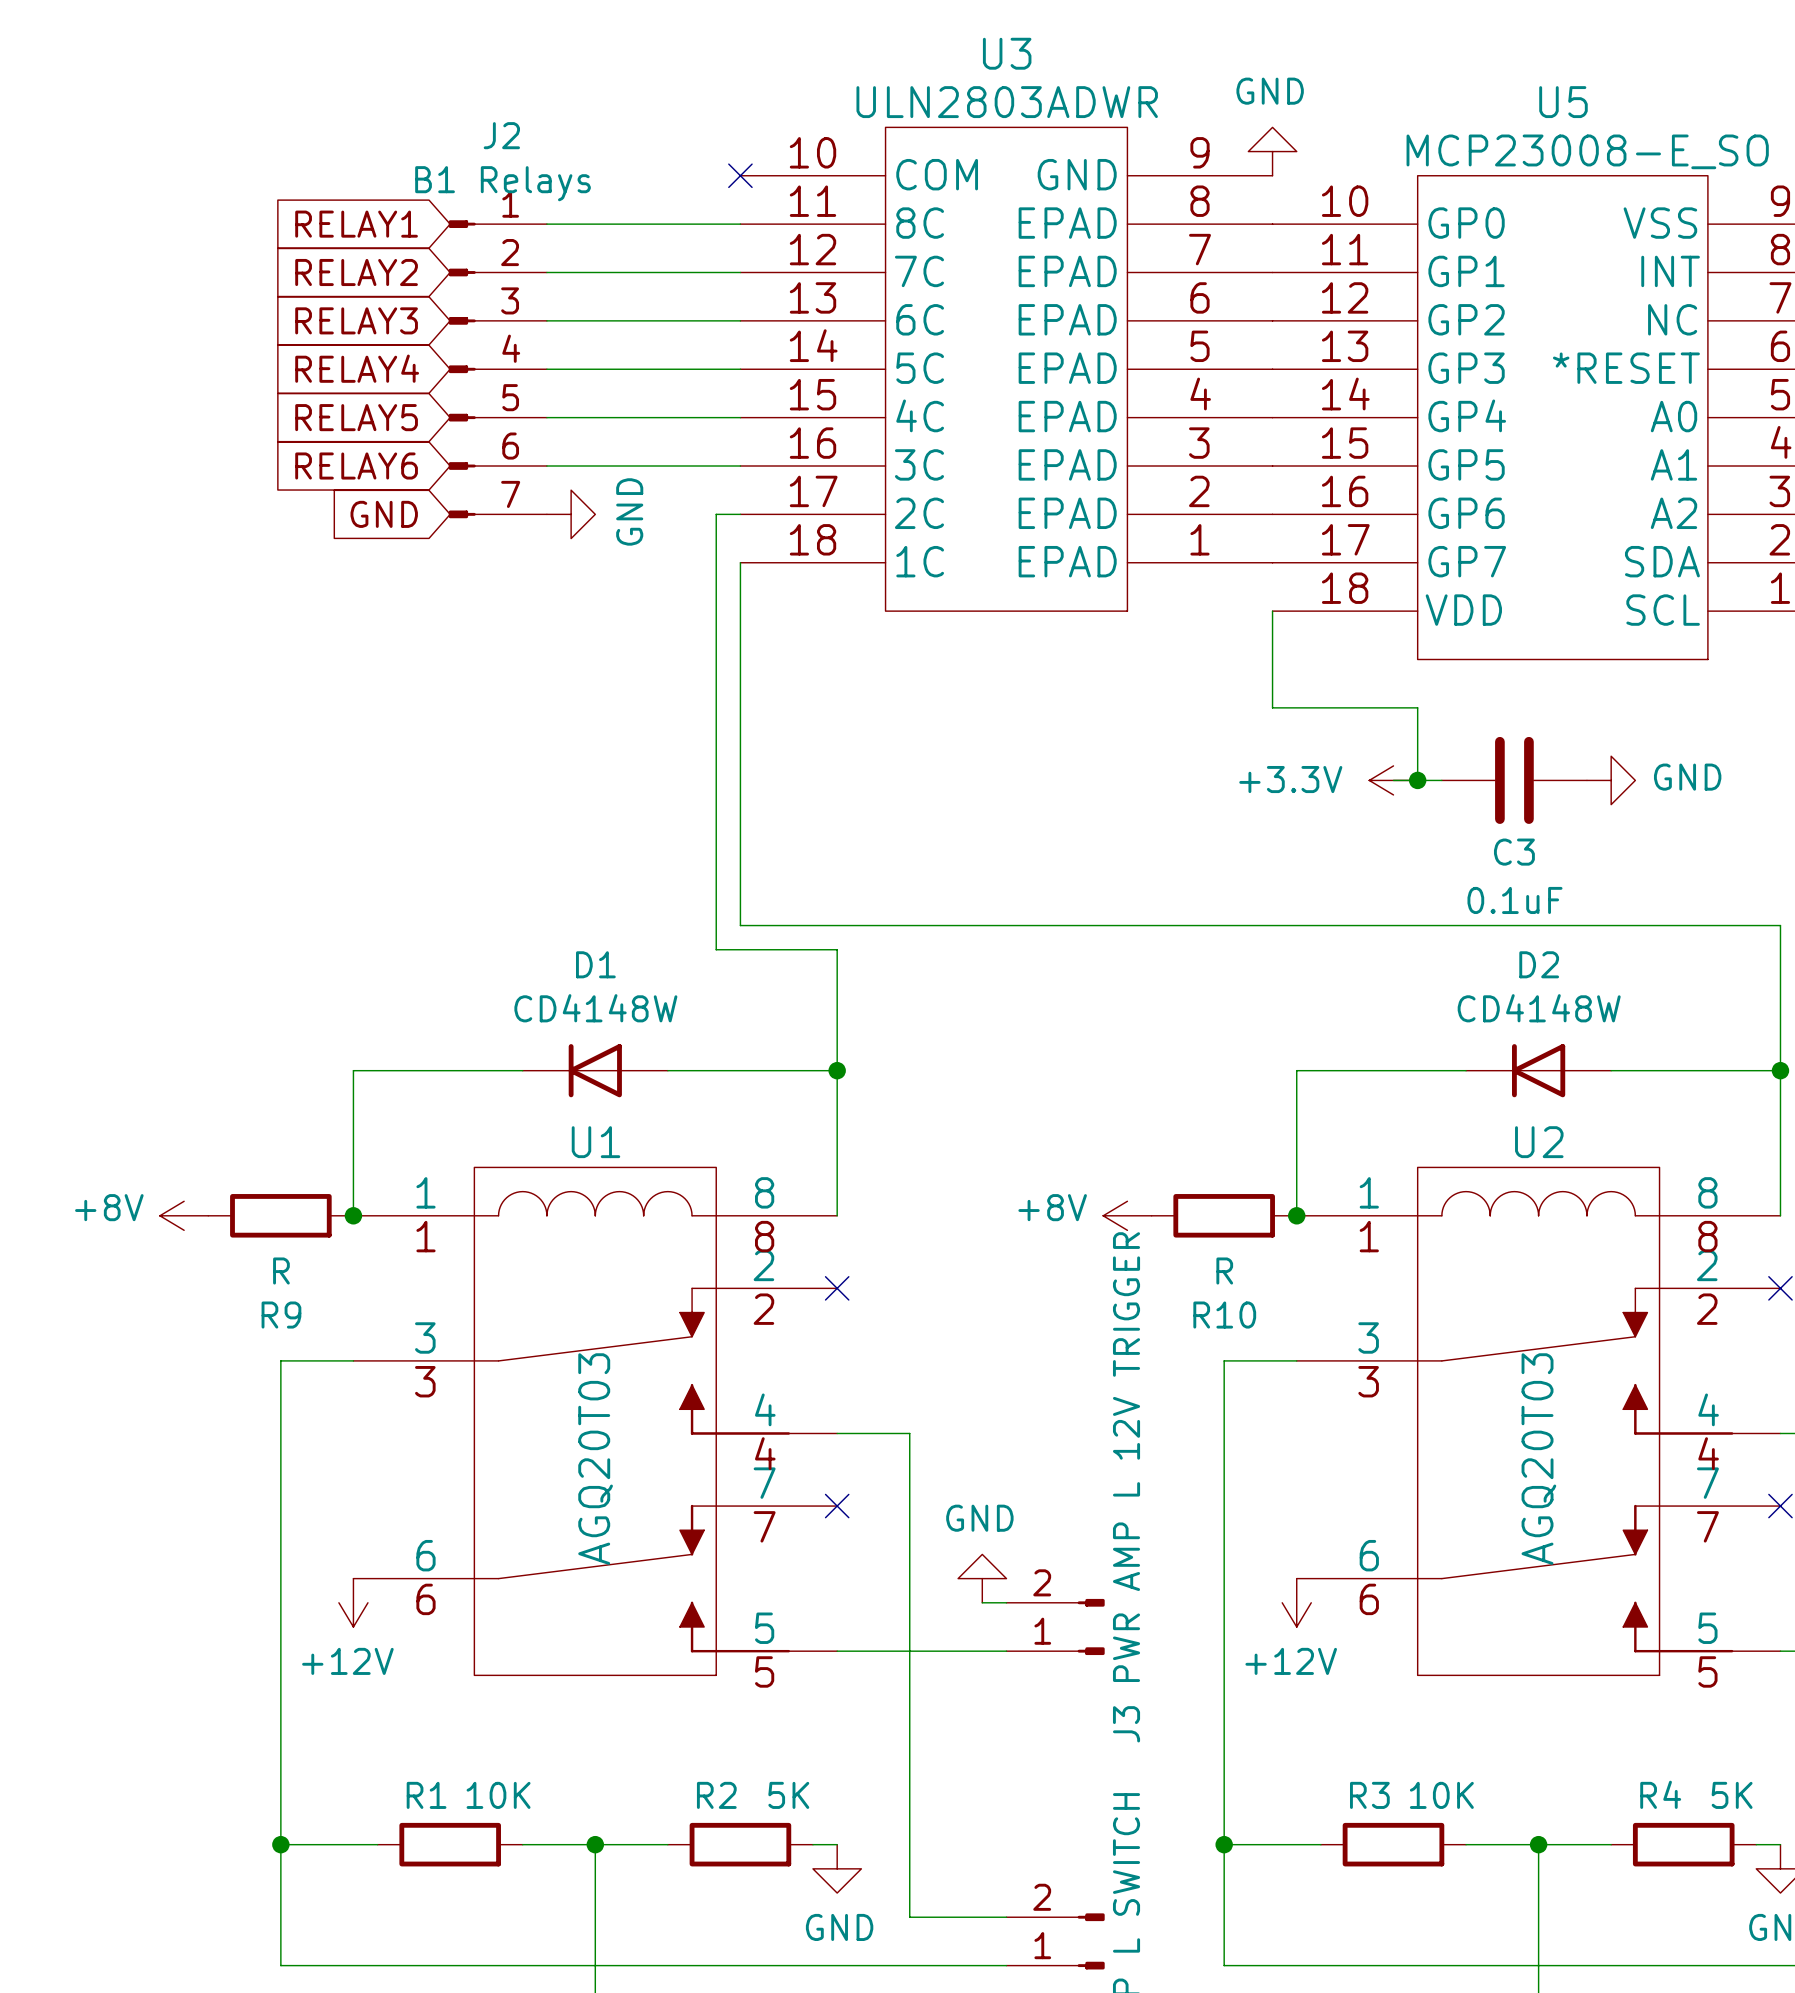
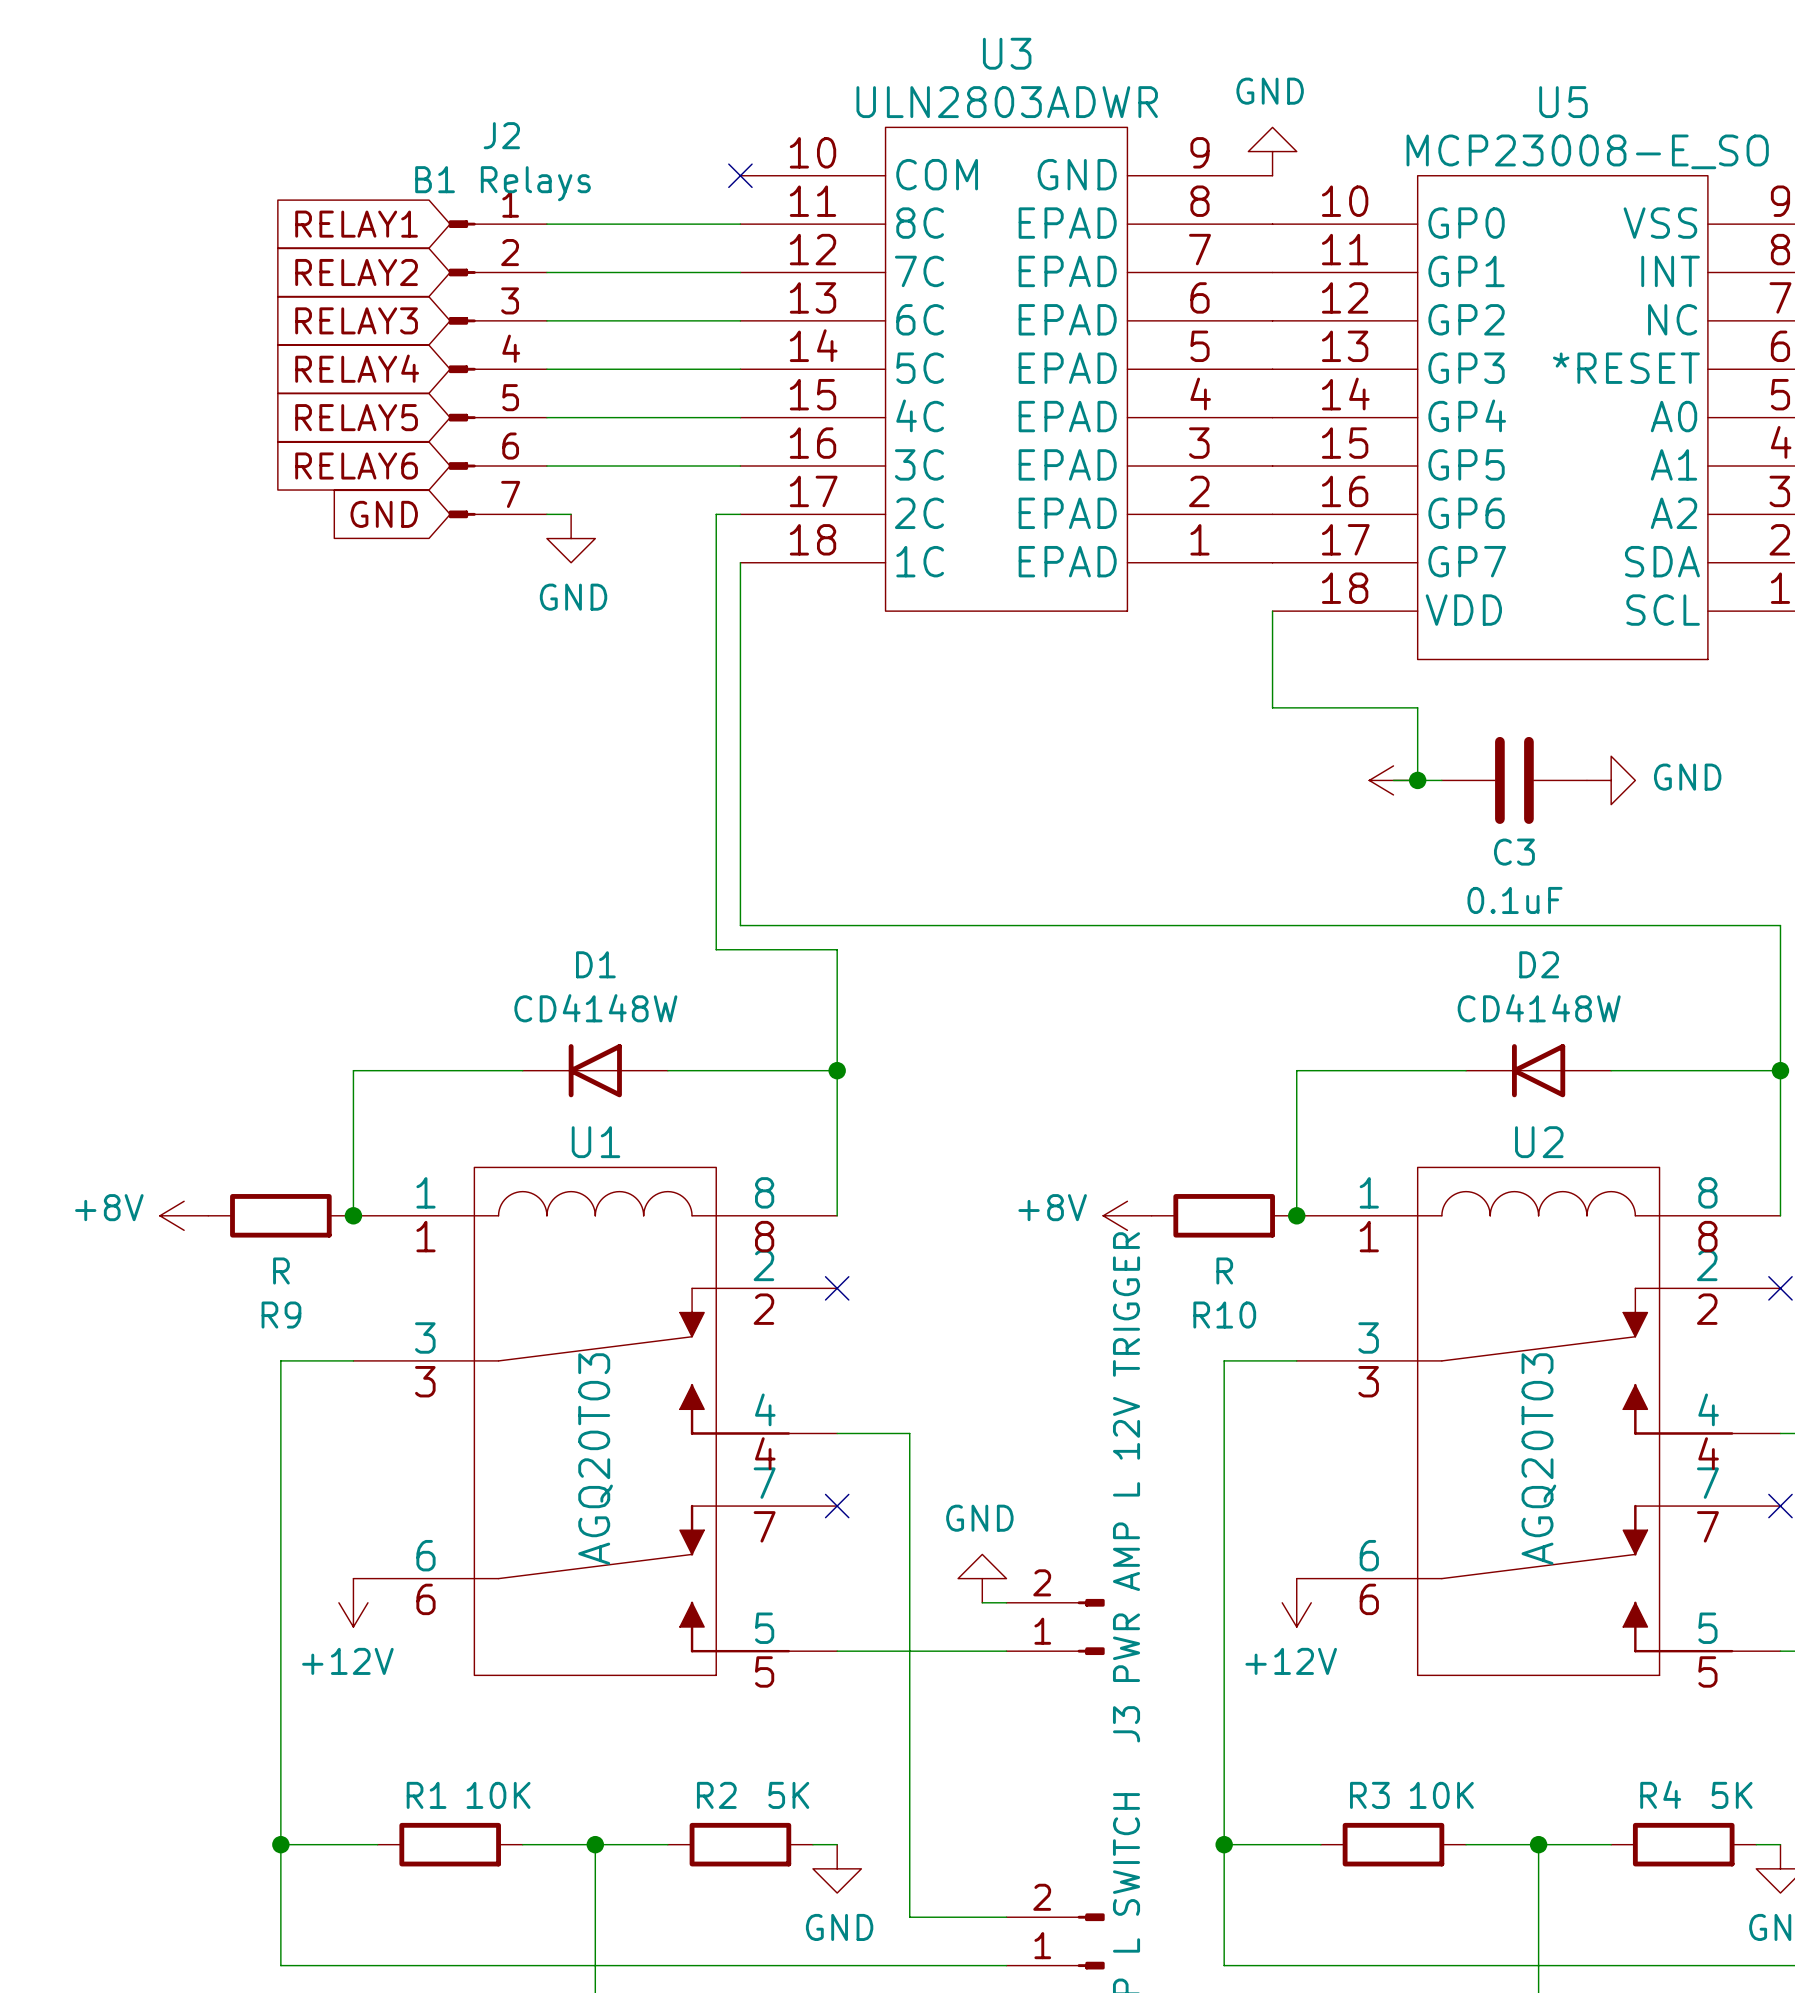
power symbol rotation: 0° (571, 514) -> 90° clockwise (571, 538)
power symbol text: +3.3V (1290, 779) -> none

